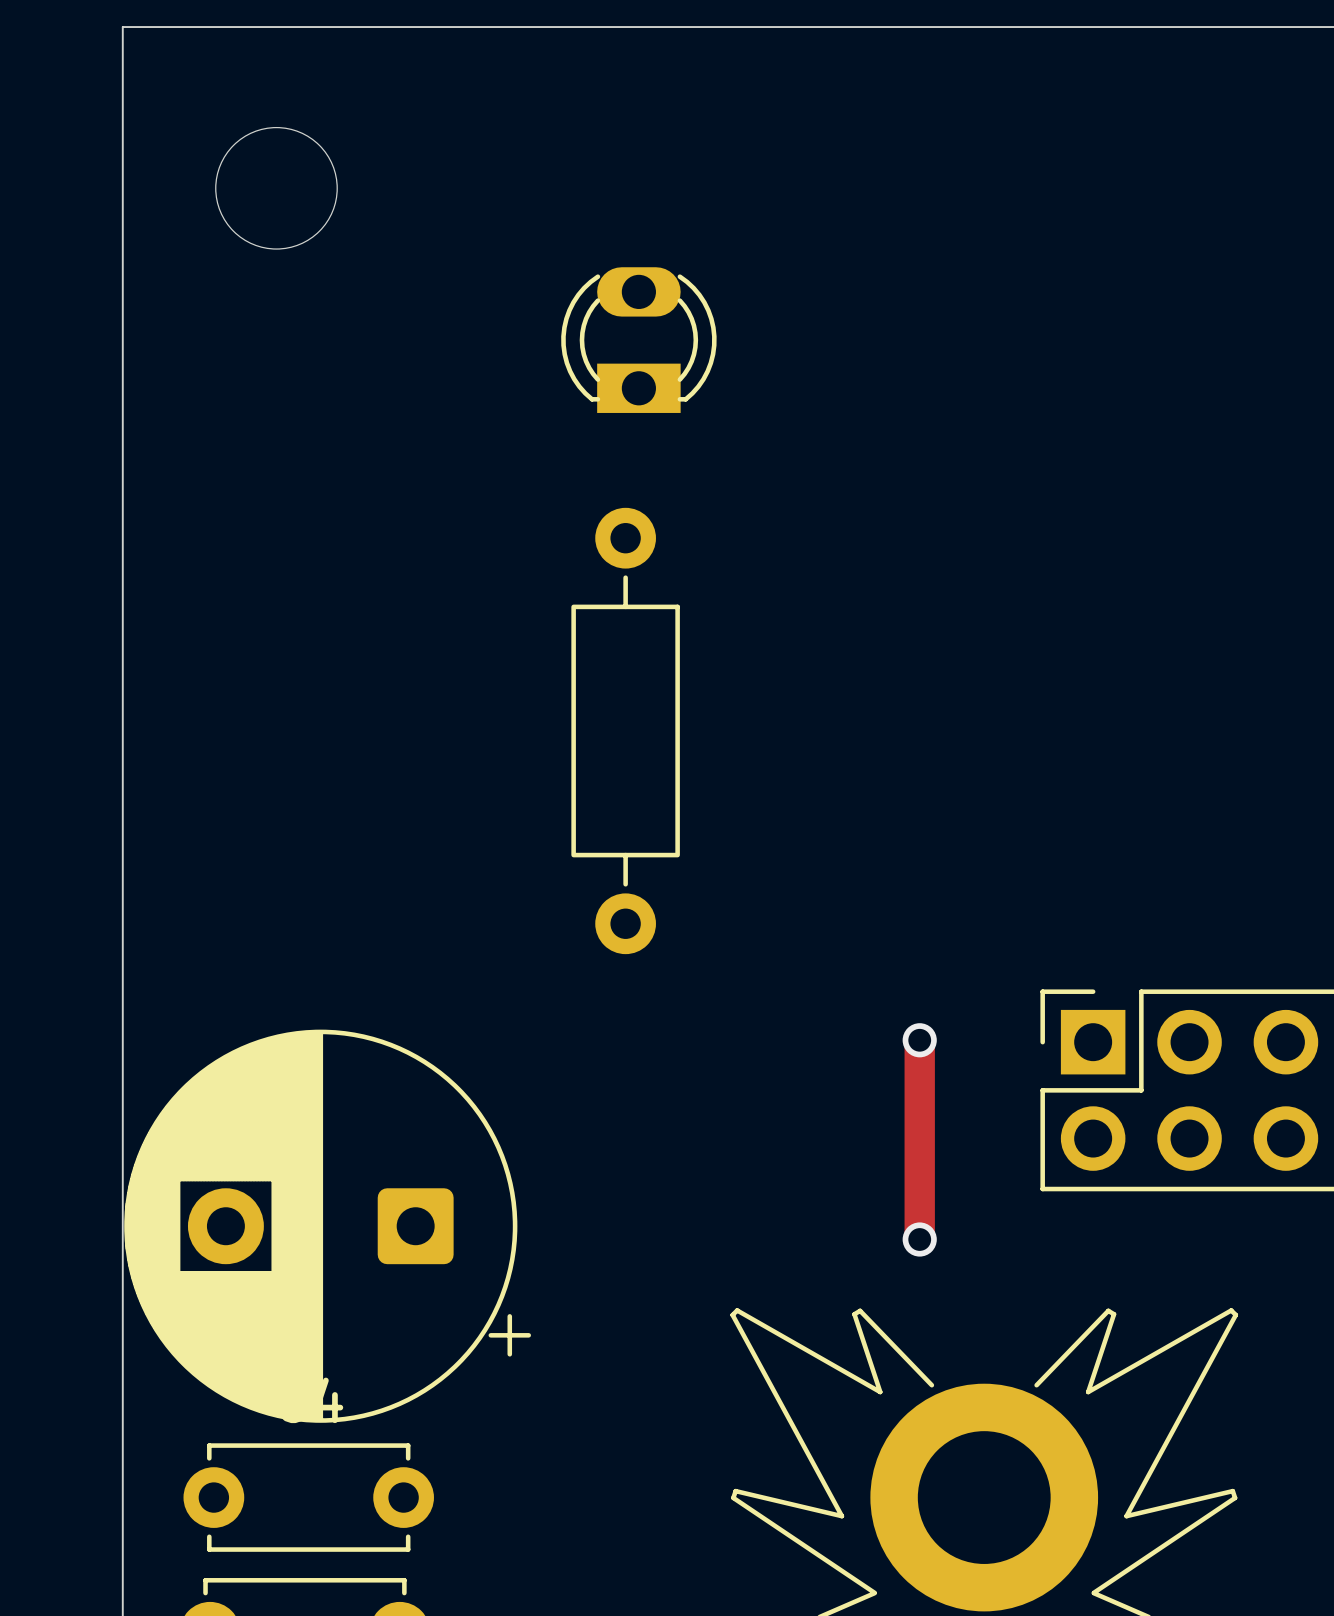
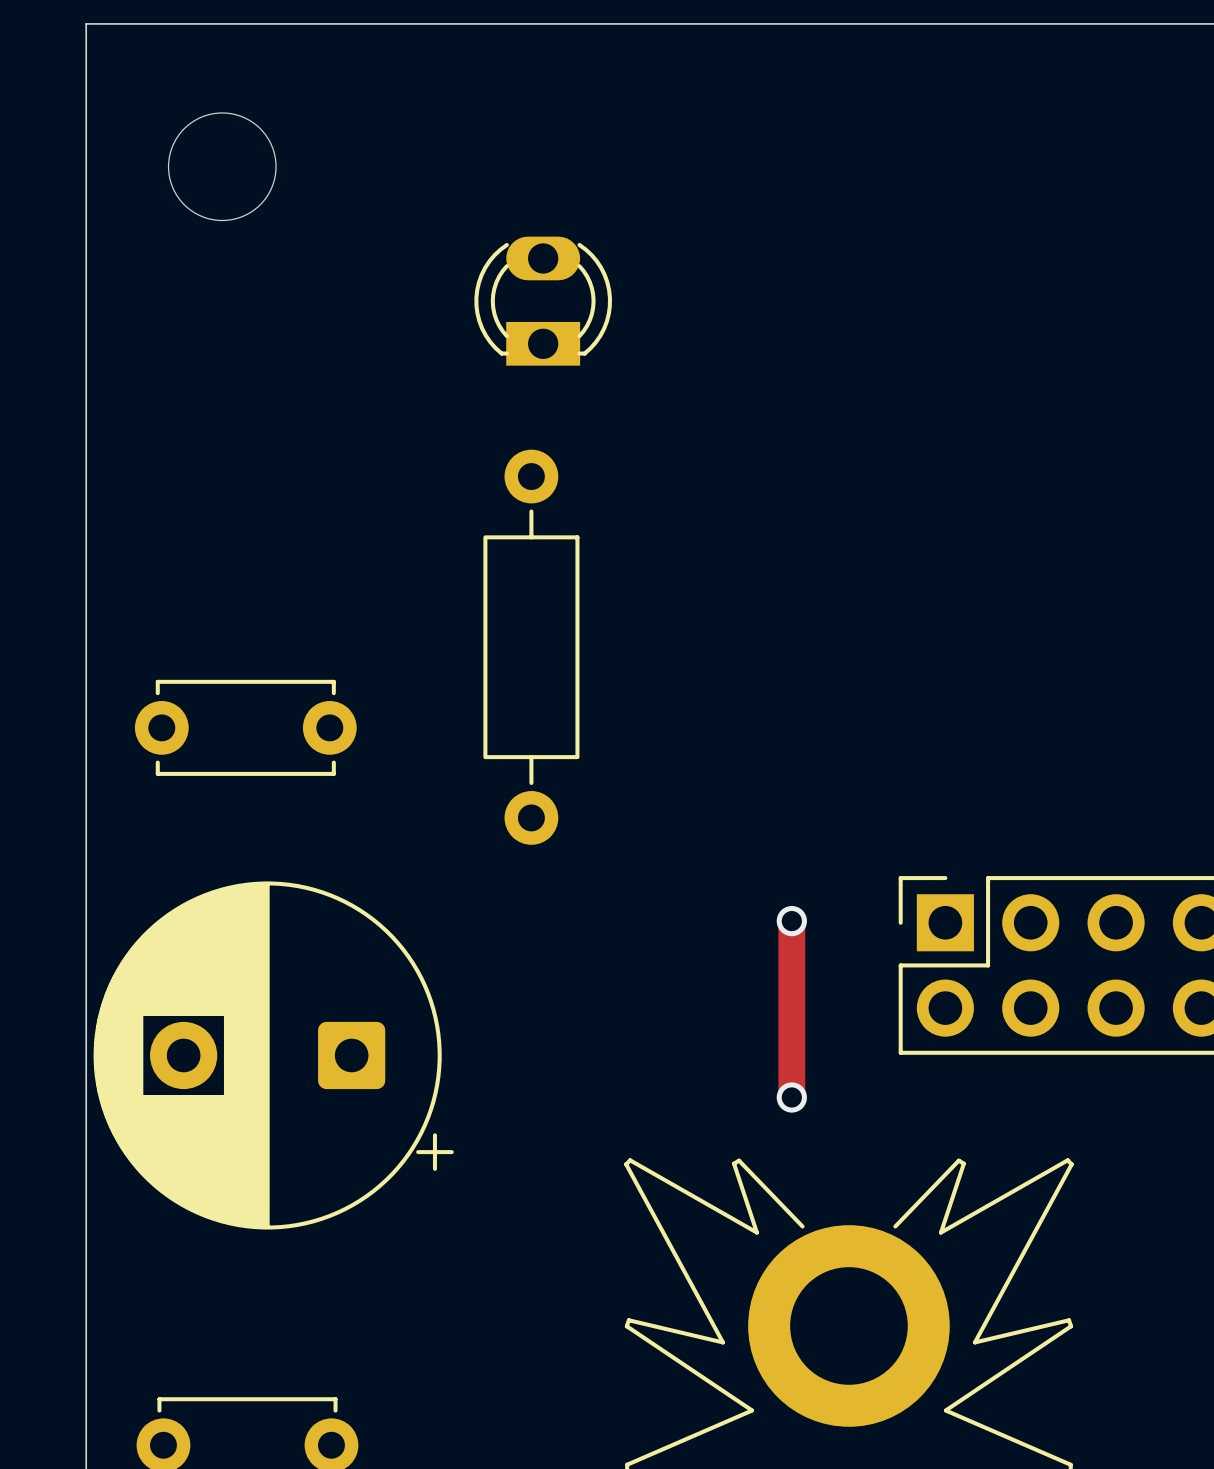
part: none -> (245, 727)
part position: (327, 1226) -> (273, 1055)
part: (308, 1497) -> none

